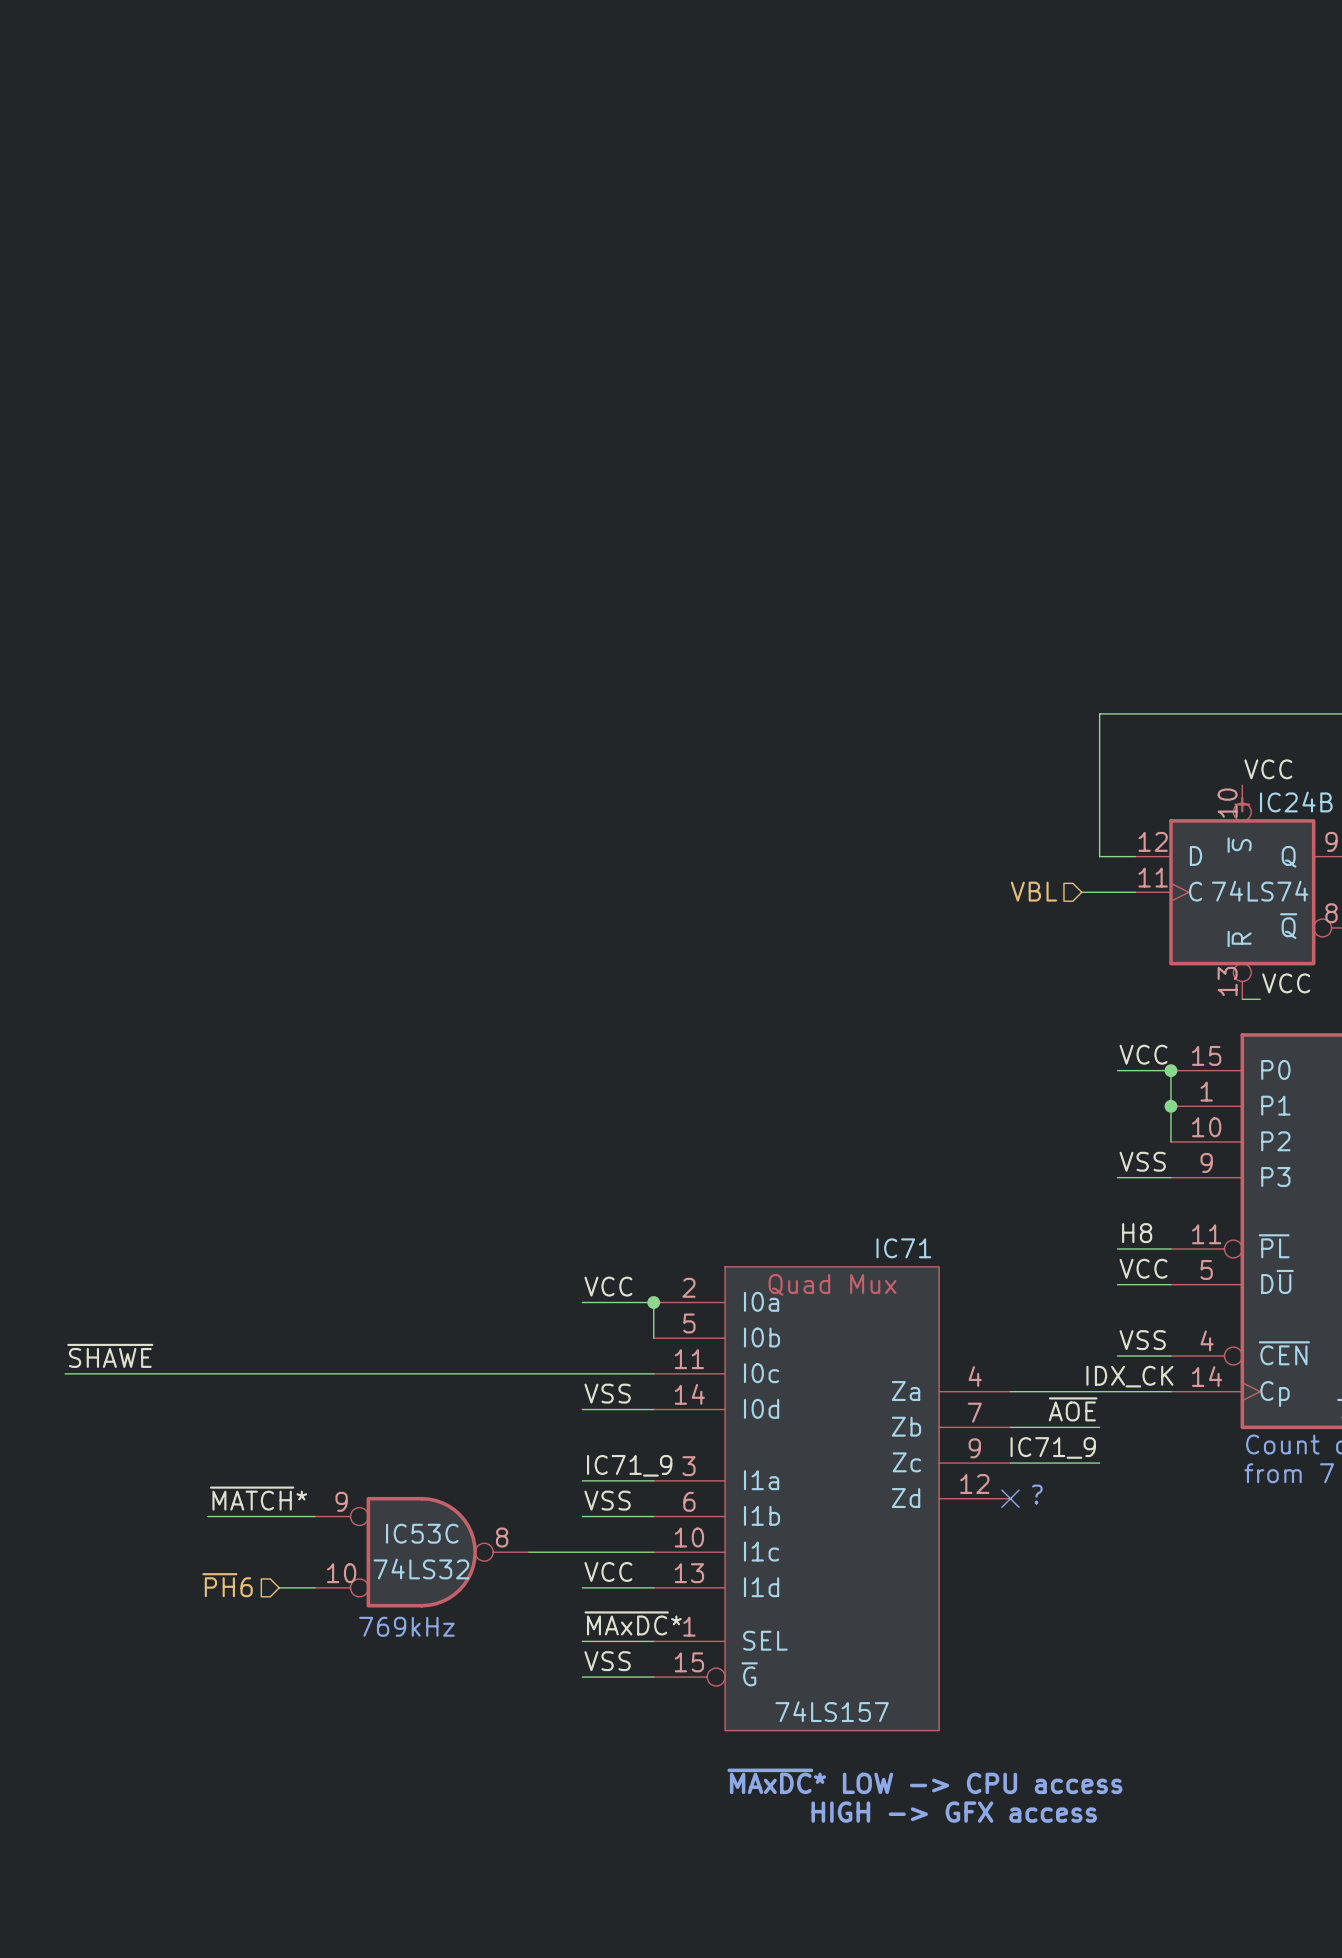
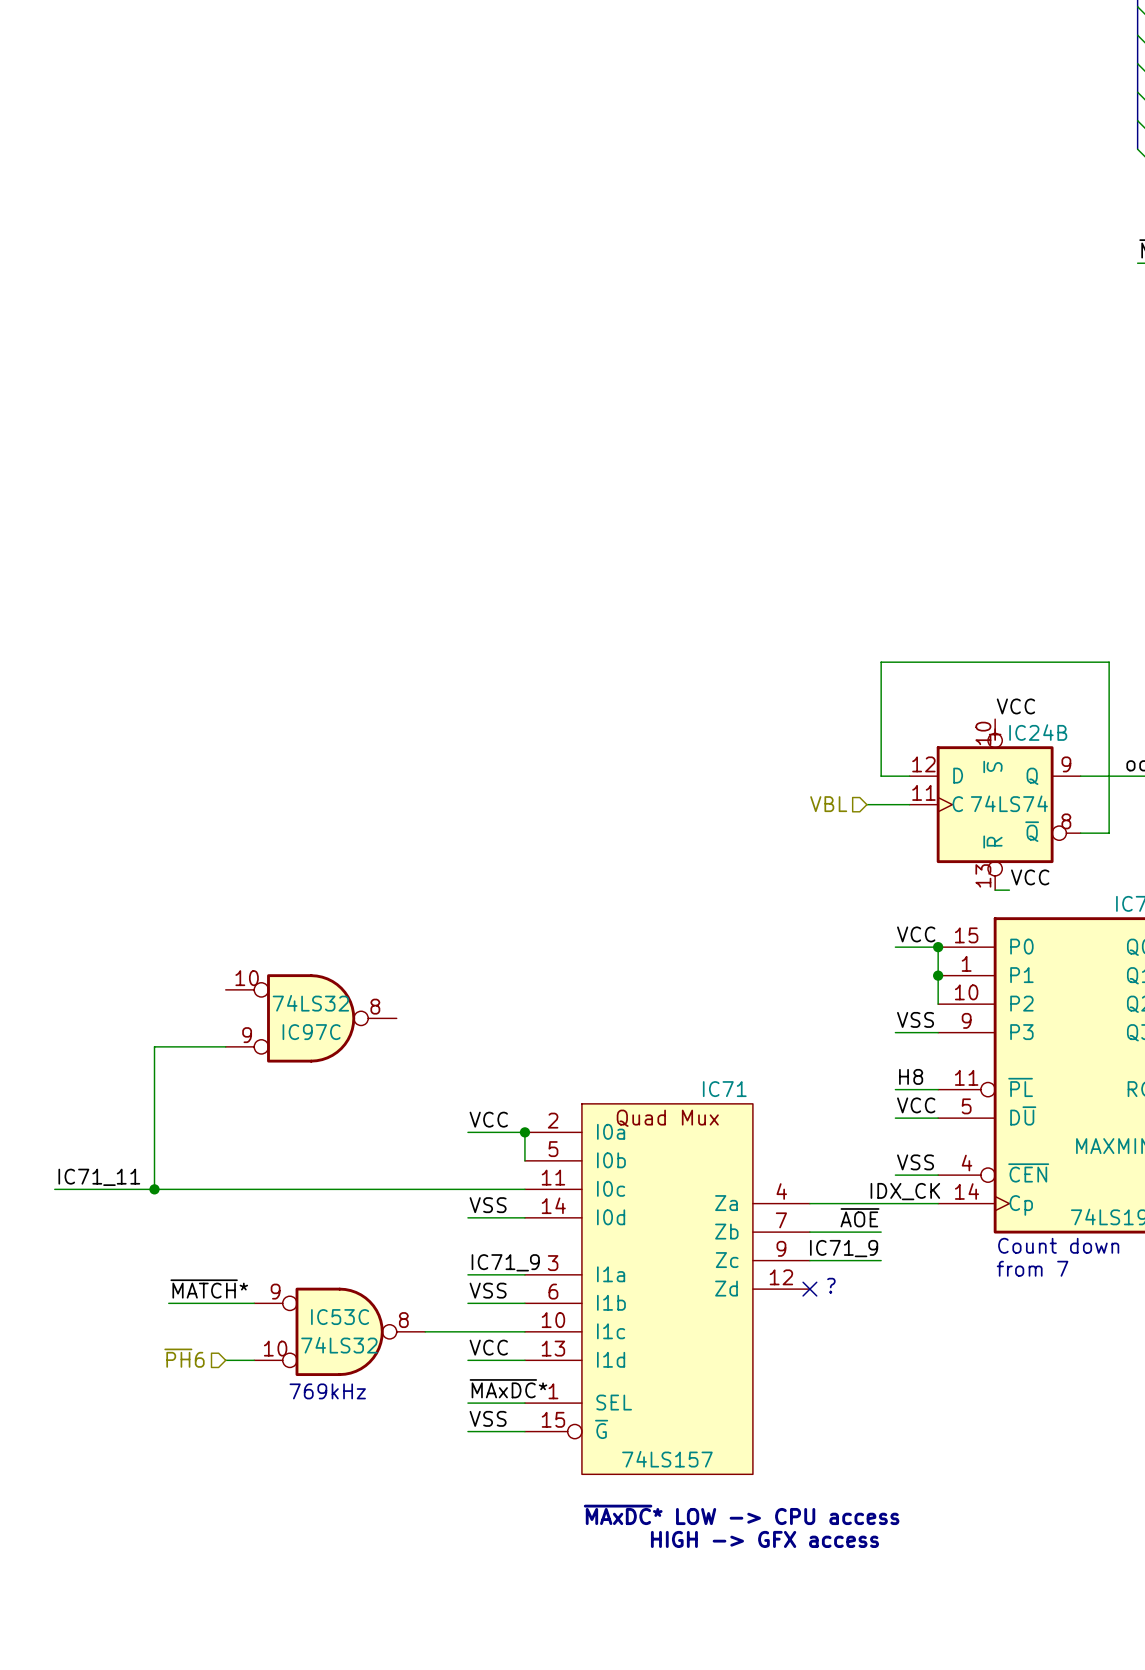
IC97C: none -> 74LS32 (311, 1018)
wire: none -> (225, 1046) (154, 1046) (154, 1189)
label: ~{SHAWE} (110, 1355) -> IC71_11 (99, 1177)
junction: none -> (154, 1189)

